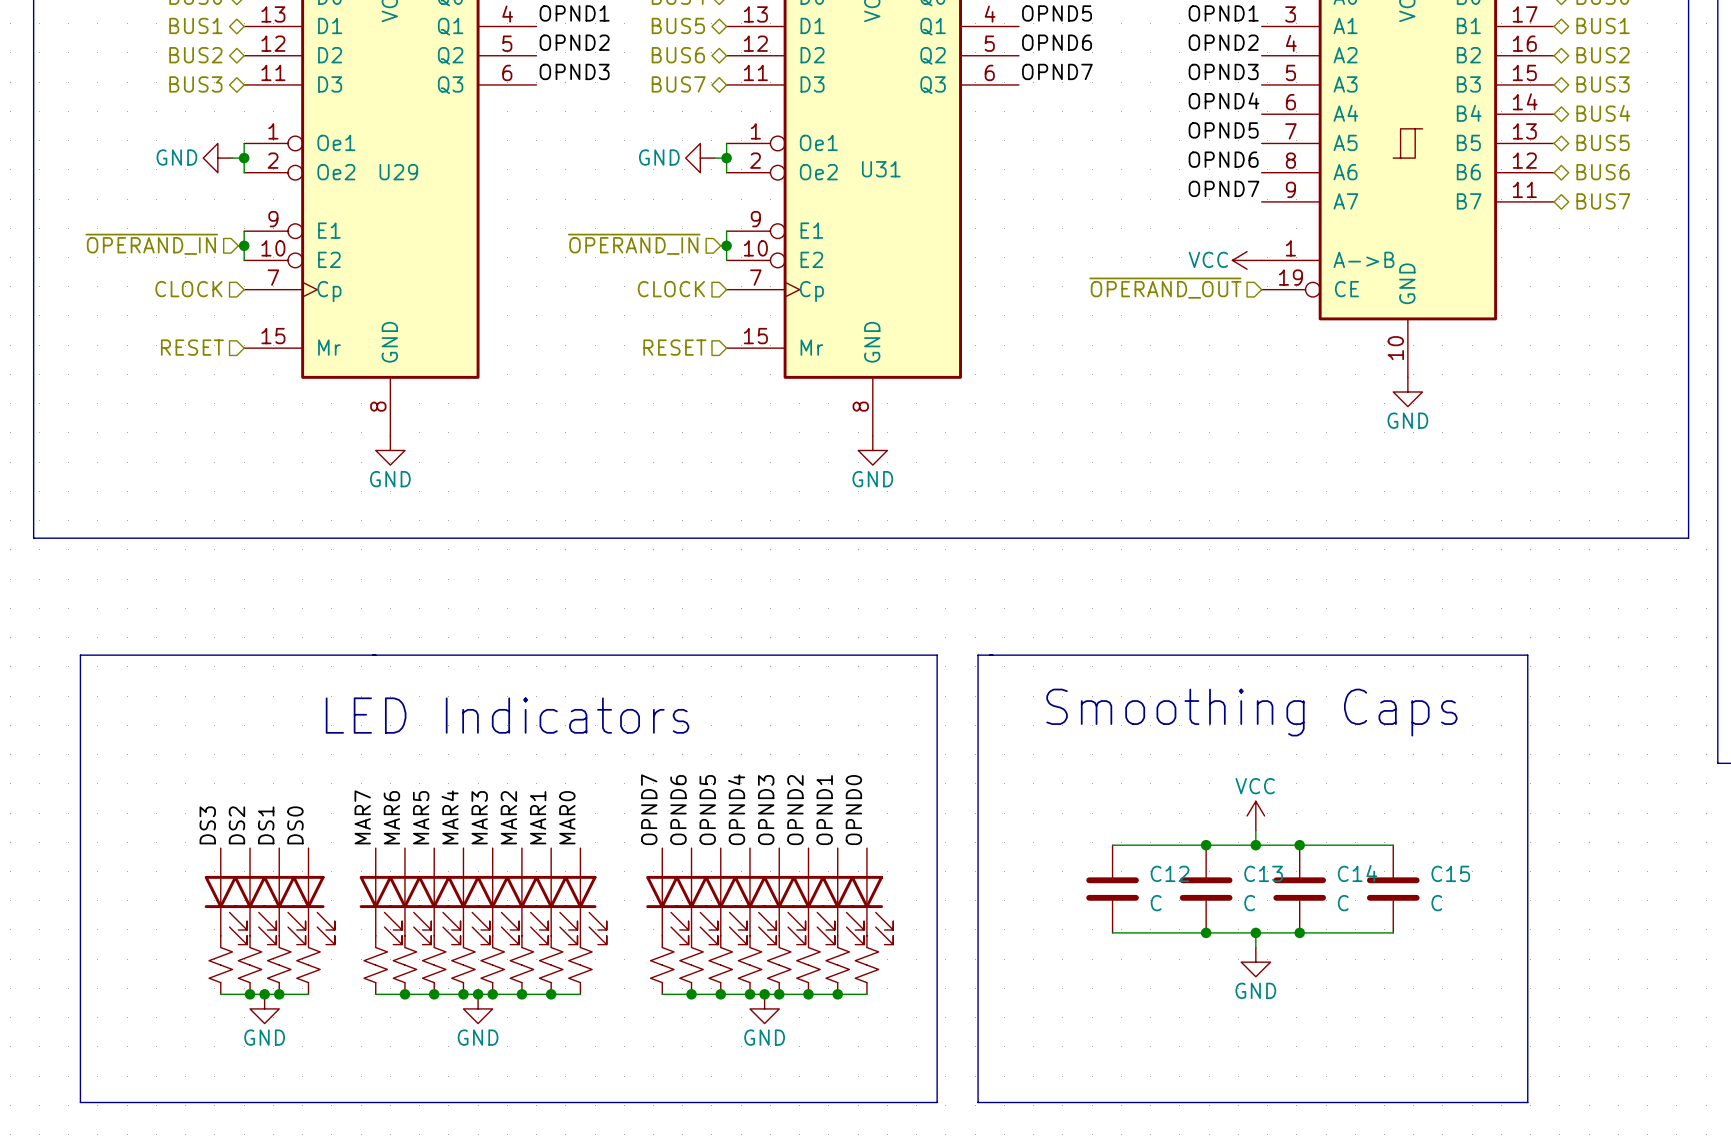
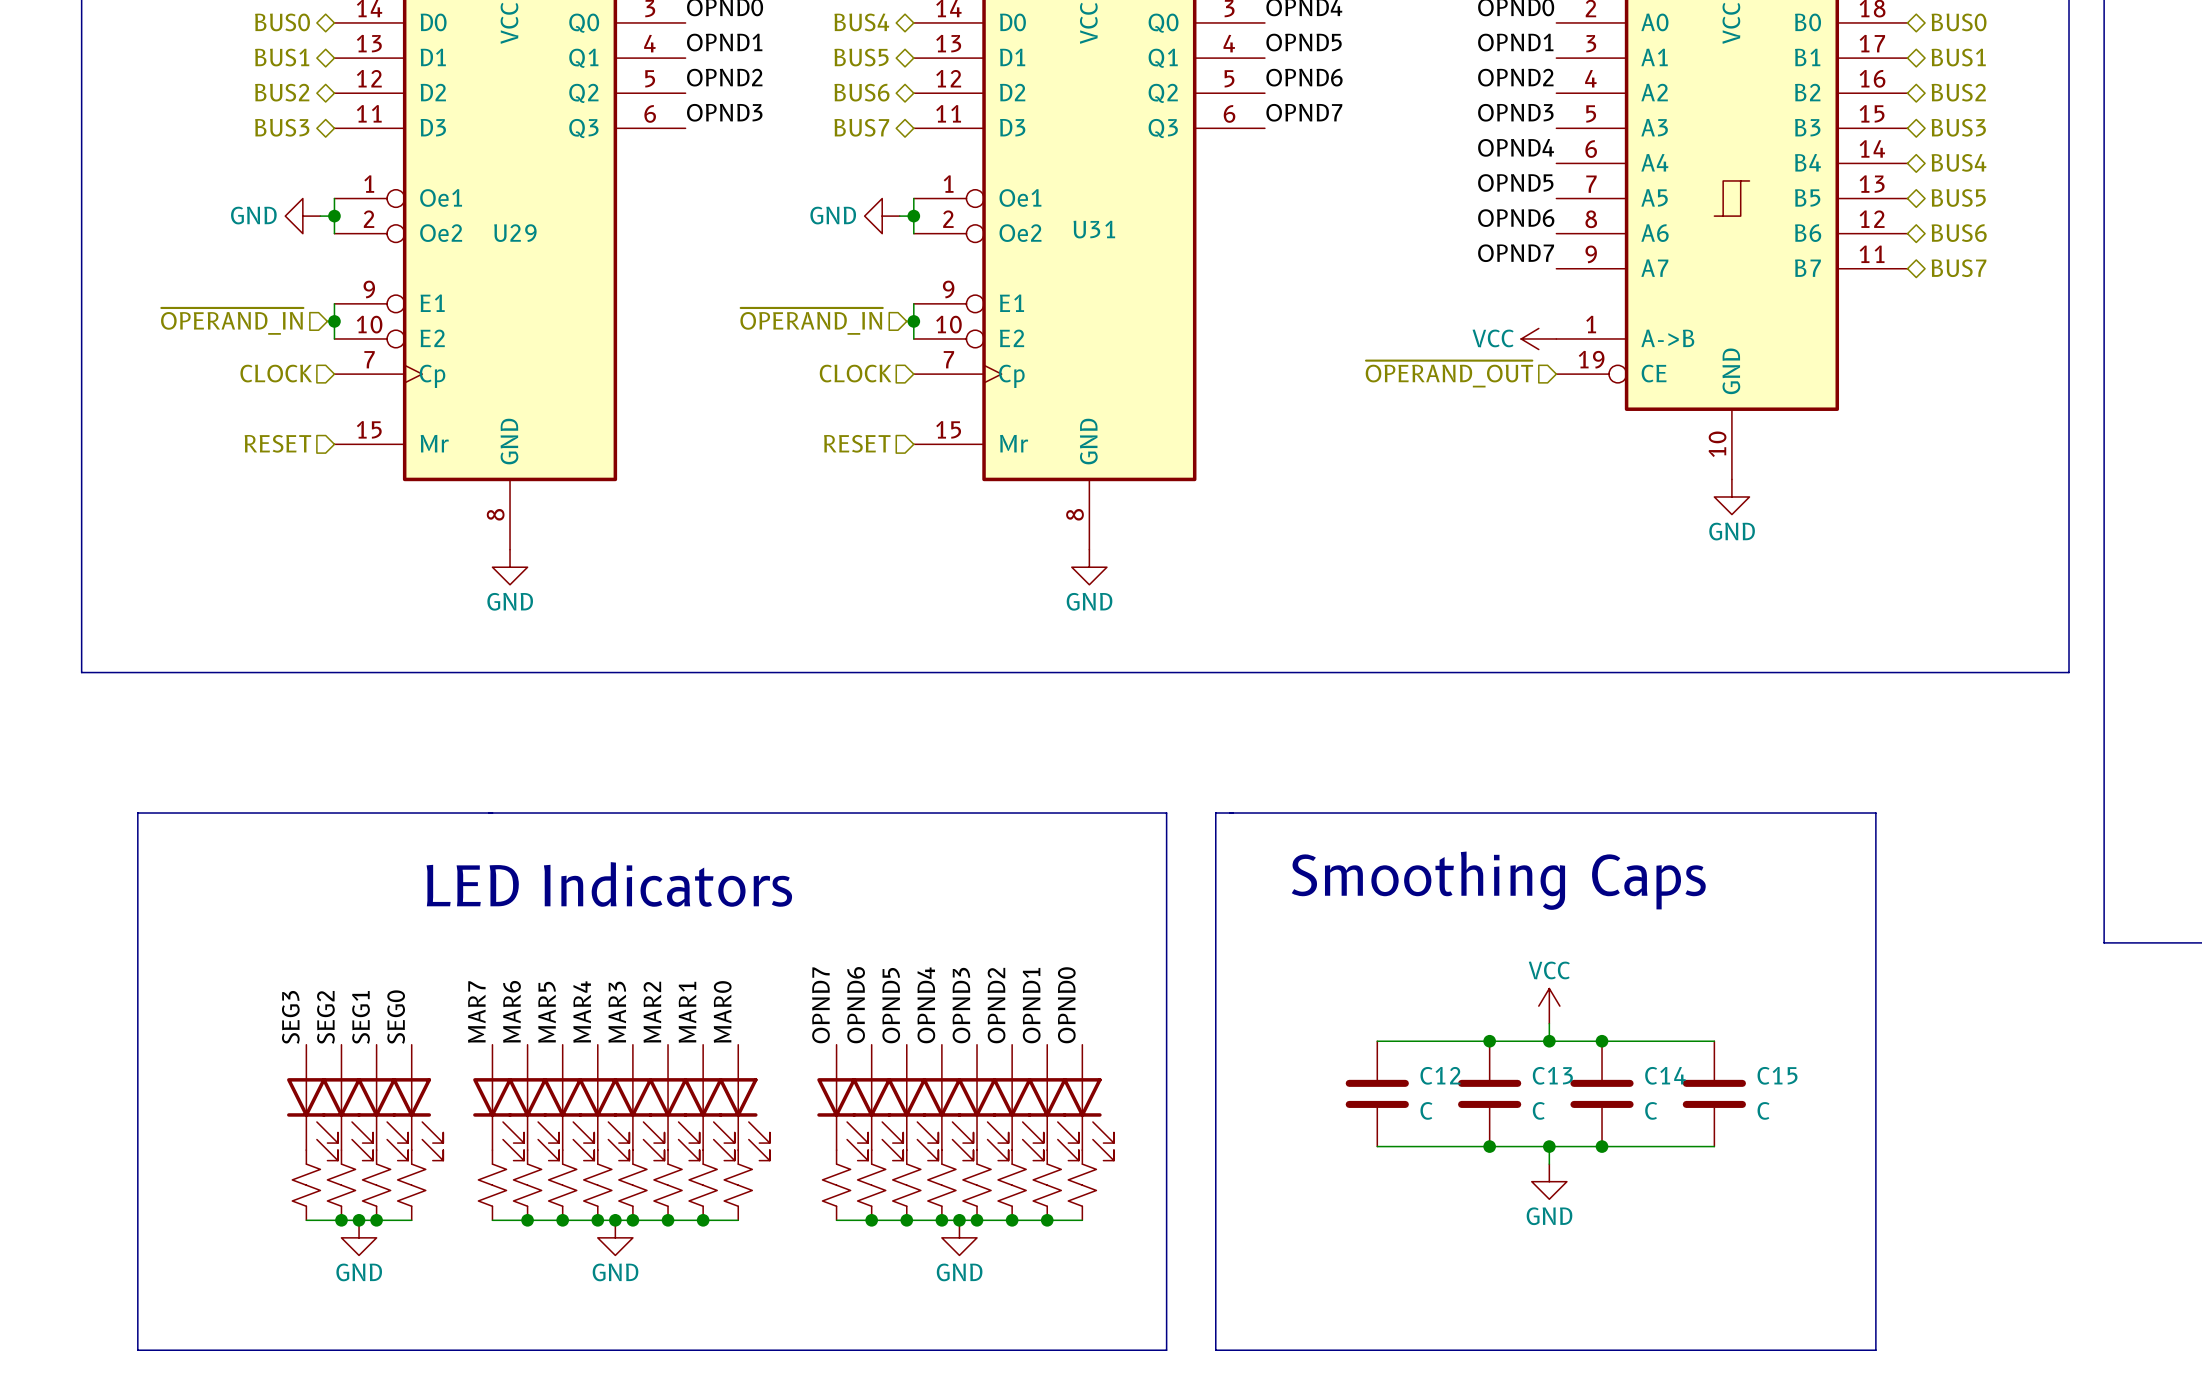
label: DS3 (207, 825) -> SEG3 (290, 1017)
label: DS2 (236, 825) -> SEG2 (325, 1017)
label: DS1 (266, 825) -> SEG1 (361, 1017)
label: DS0 (295, 825) -> SEG0 (396, 1017)

